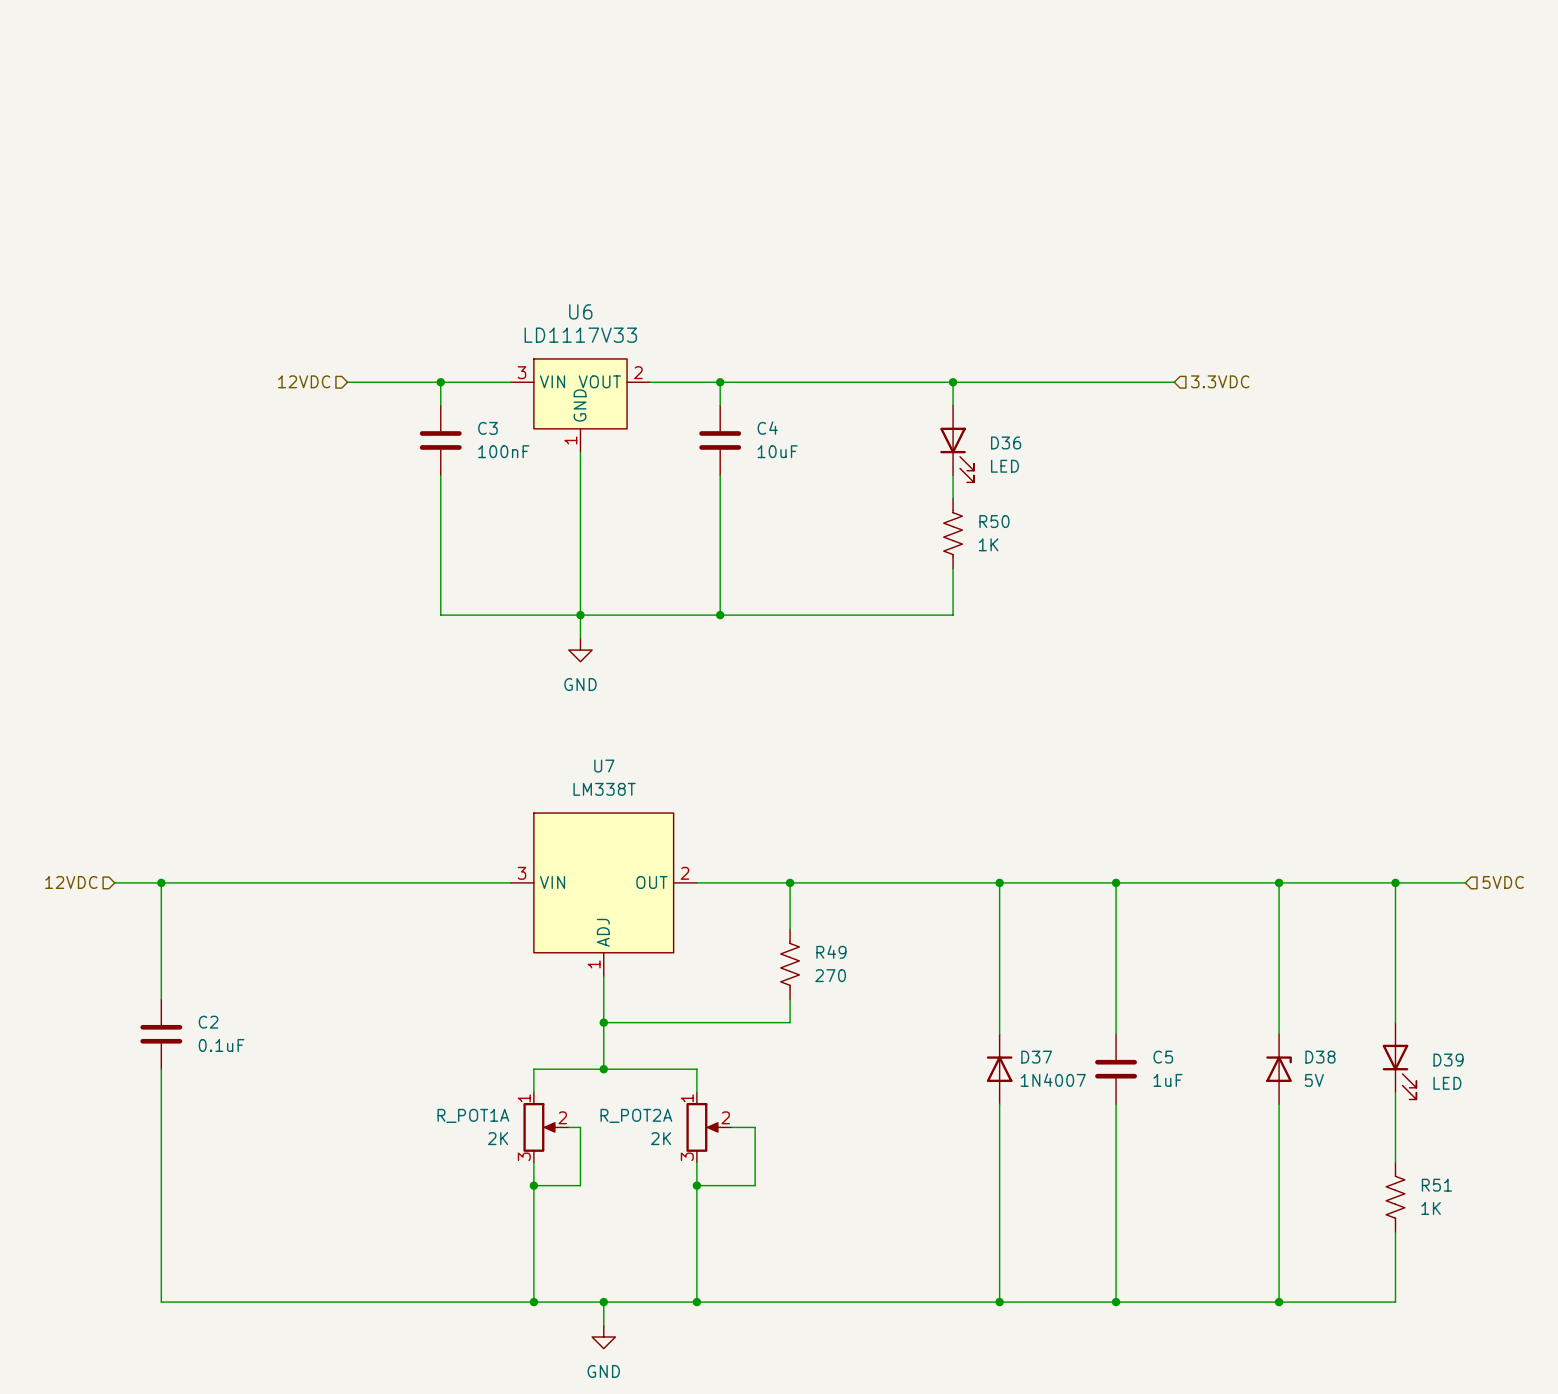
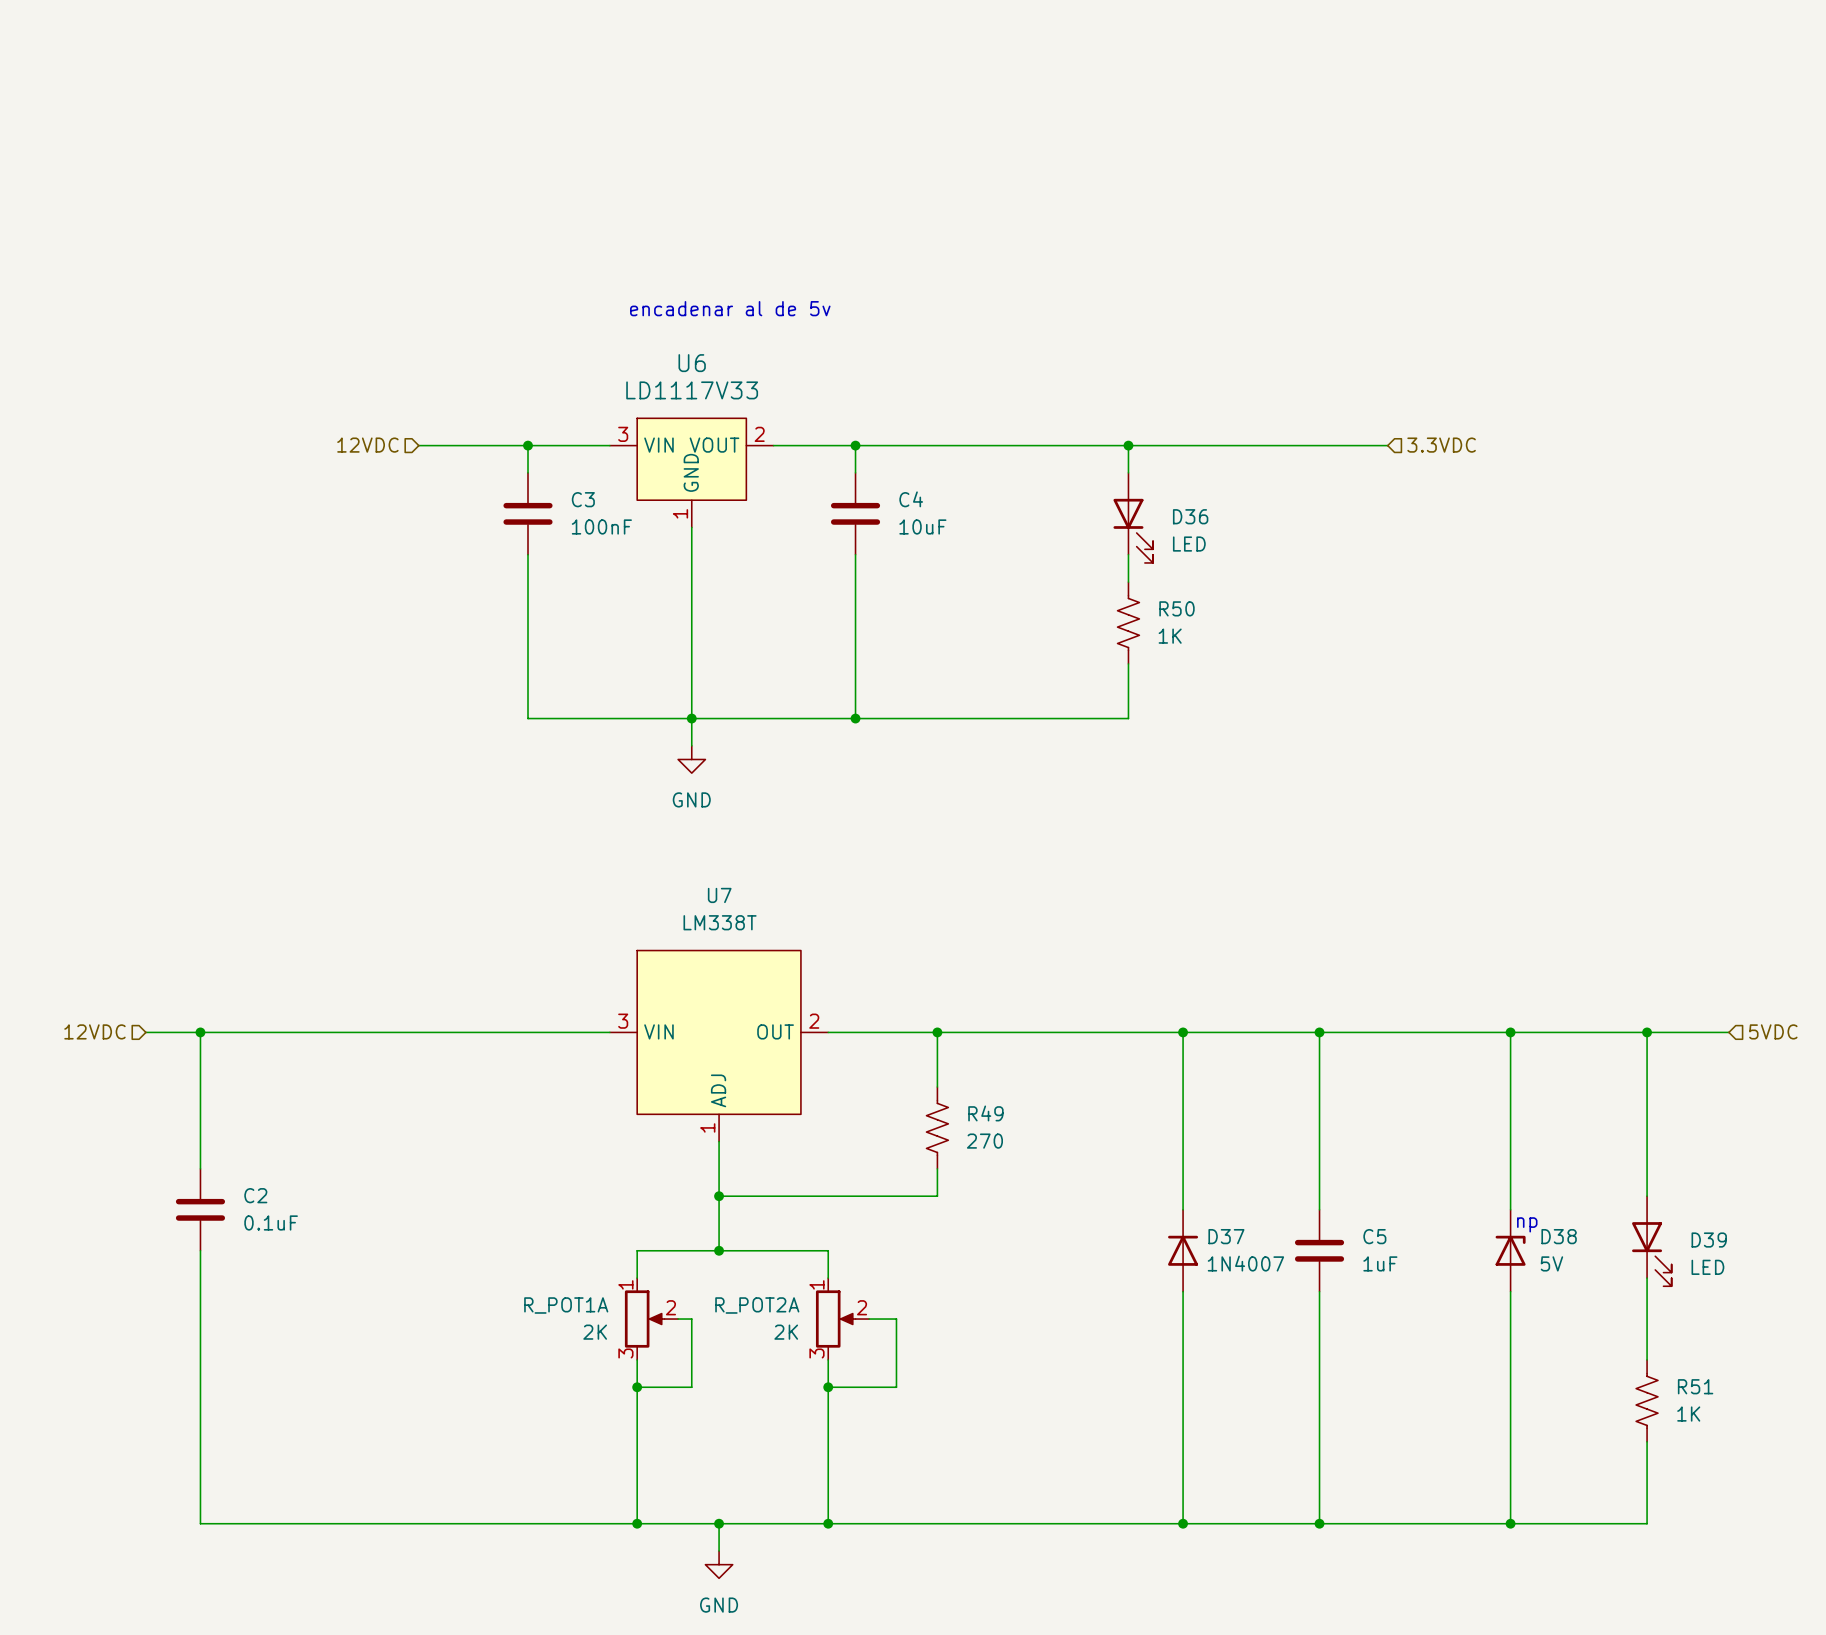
text: none -> encadenar al de 5v (730, 308)
text: none -> np (1527, 1224)

